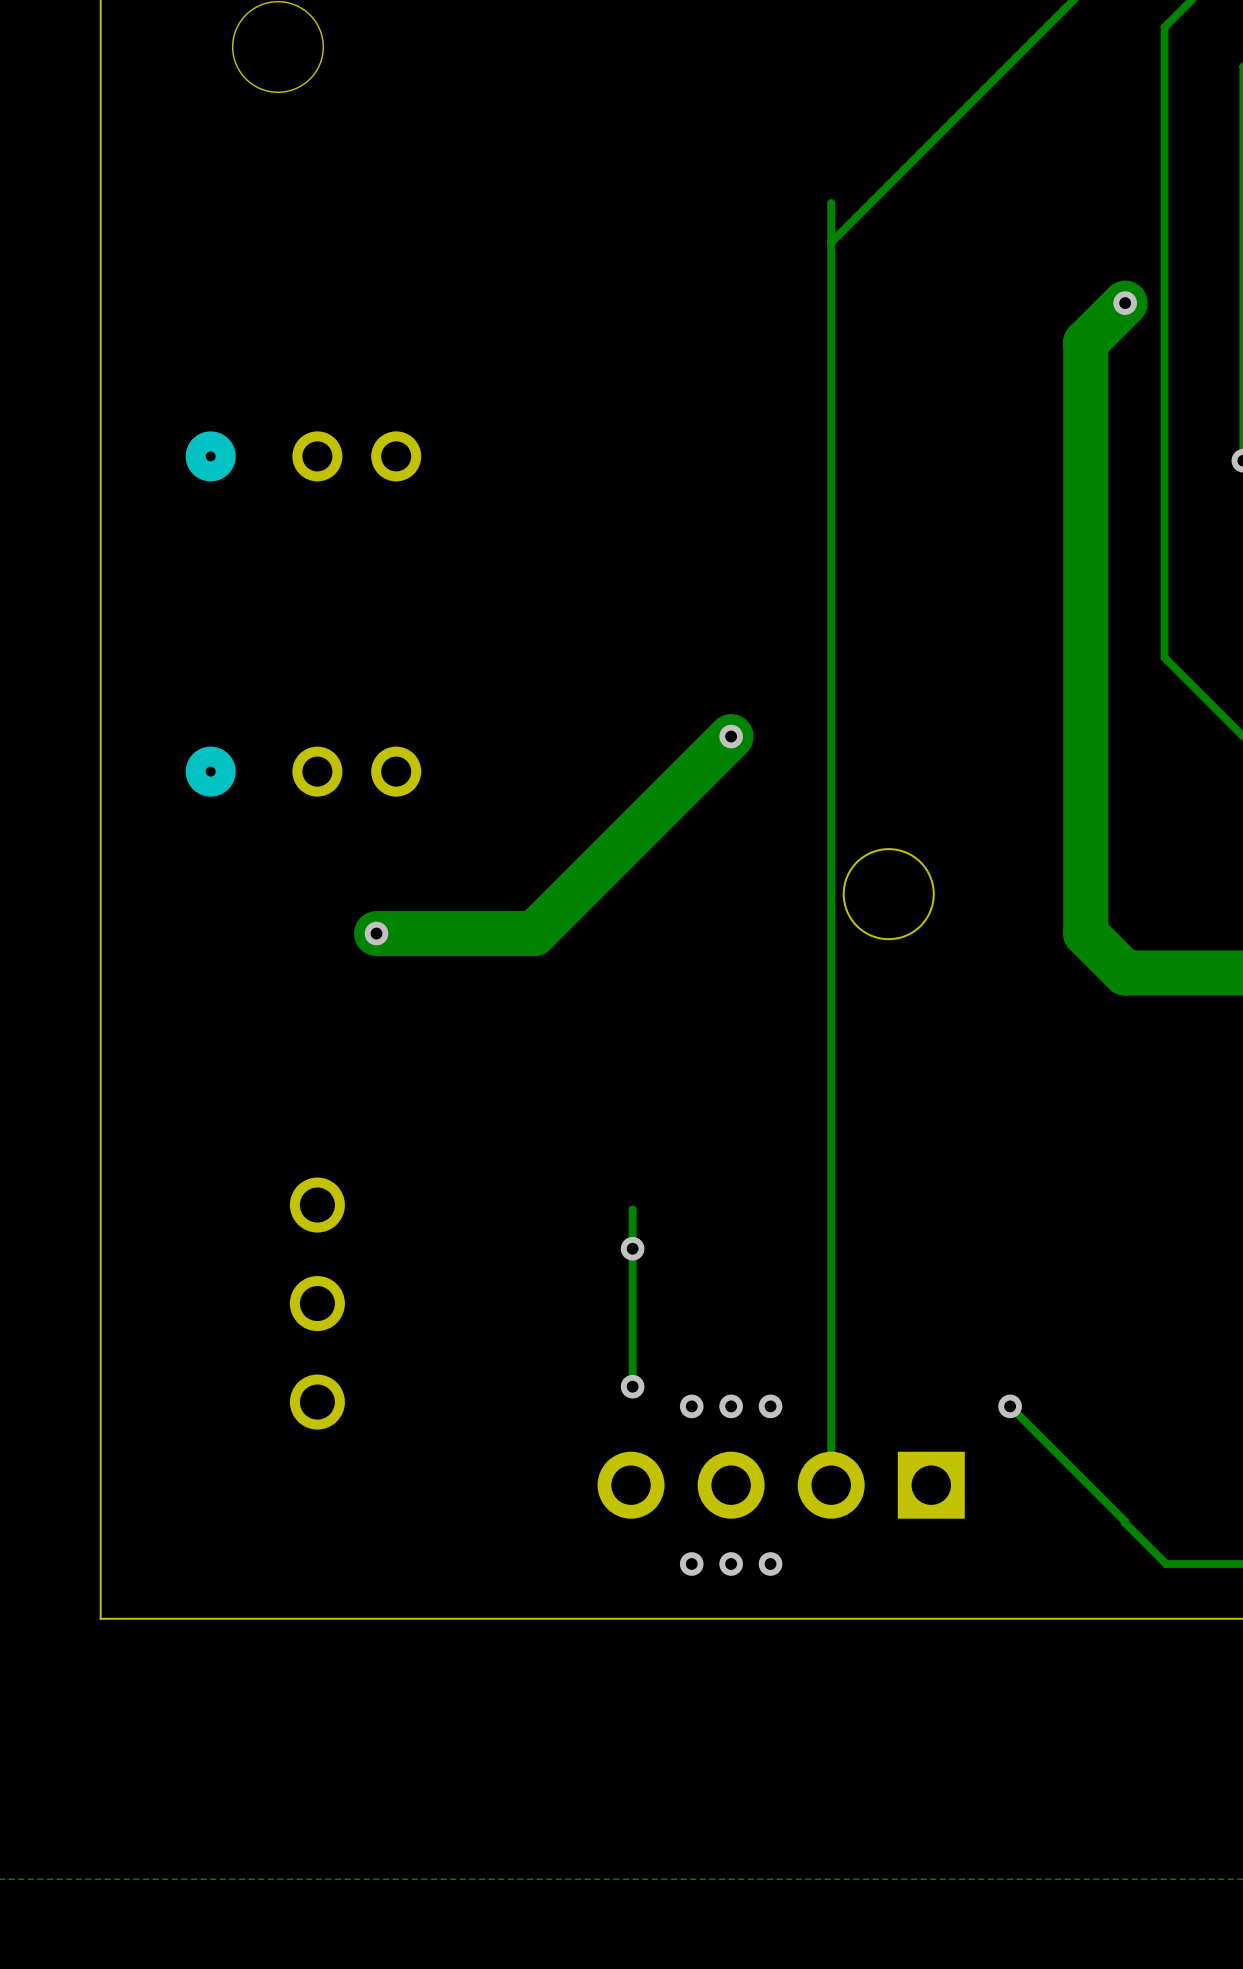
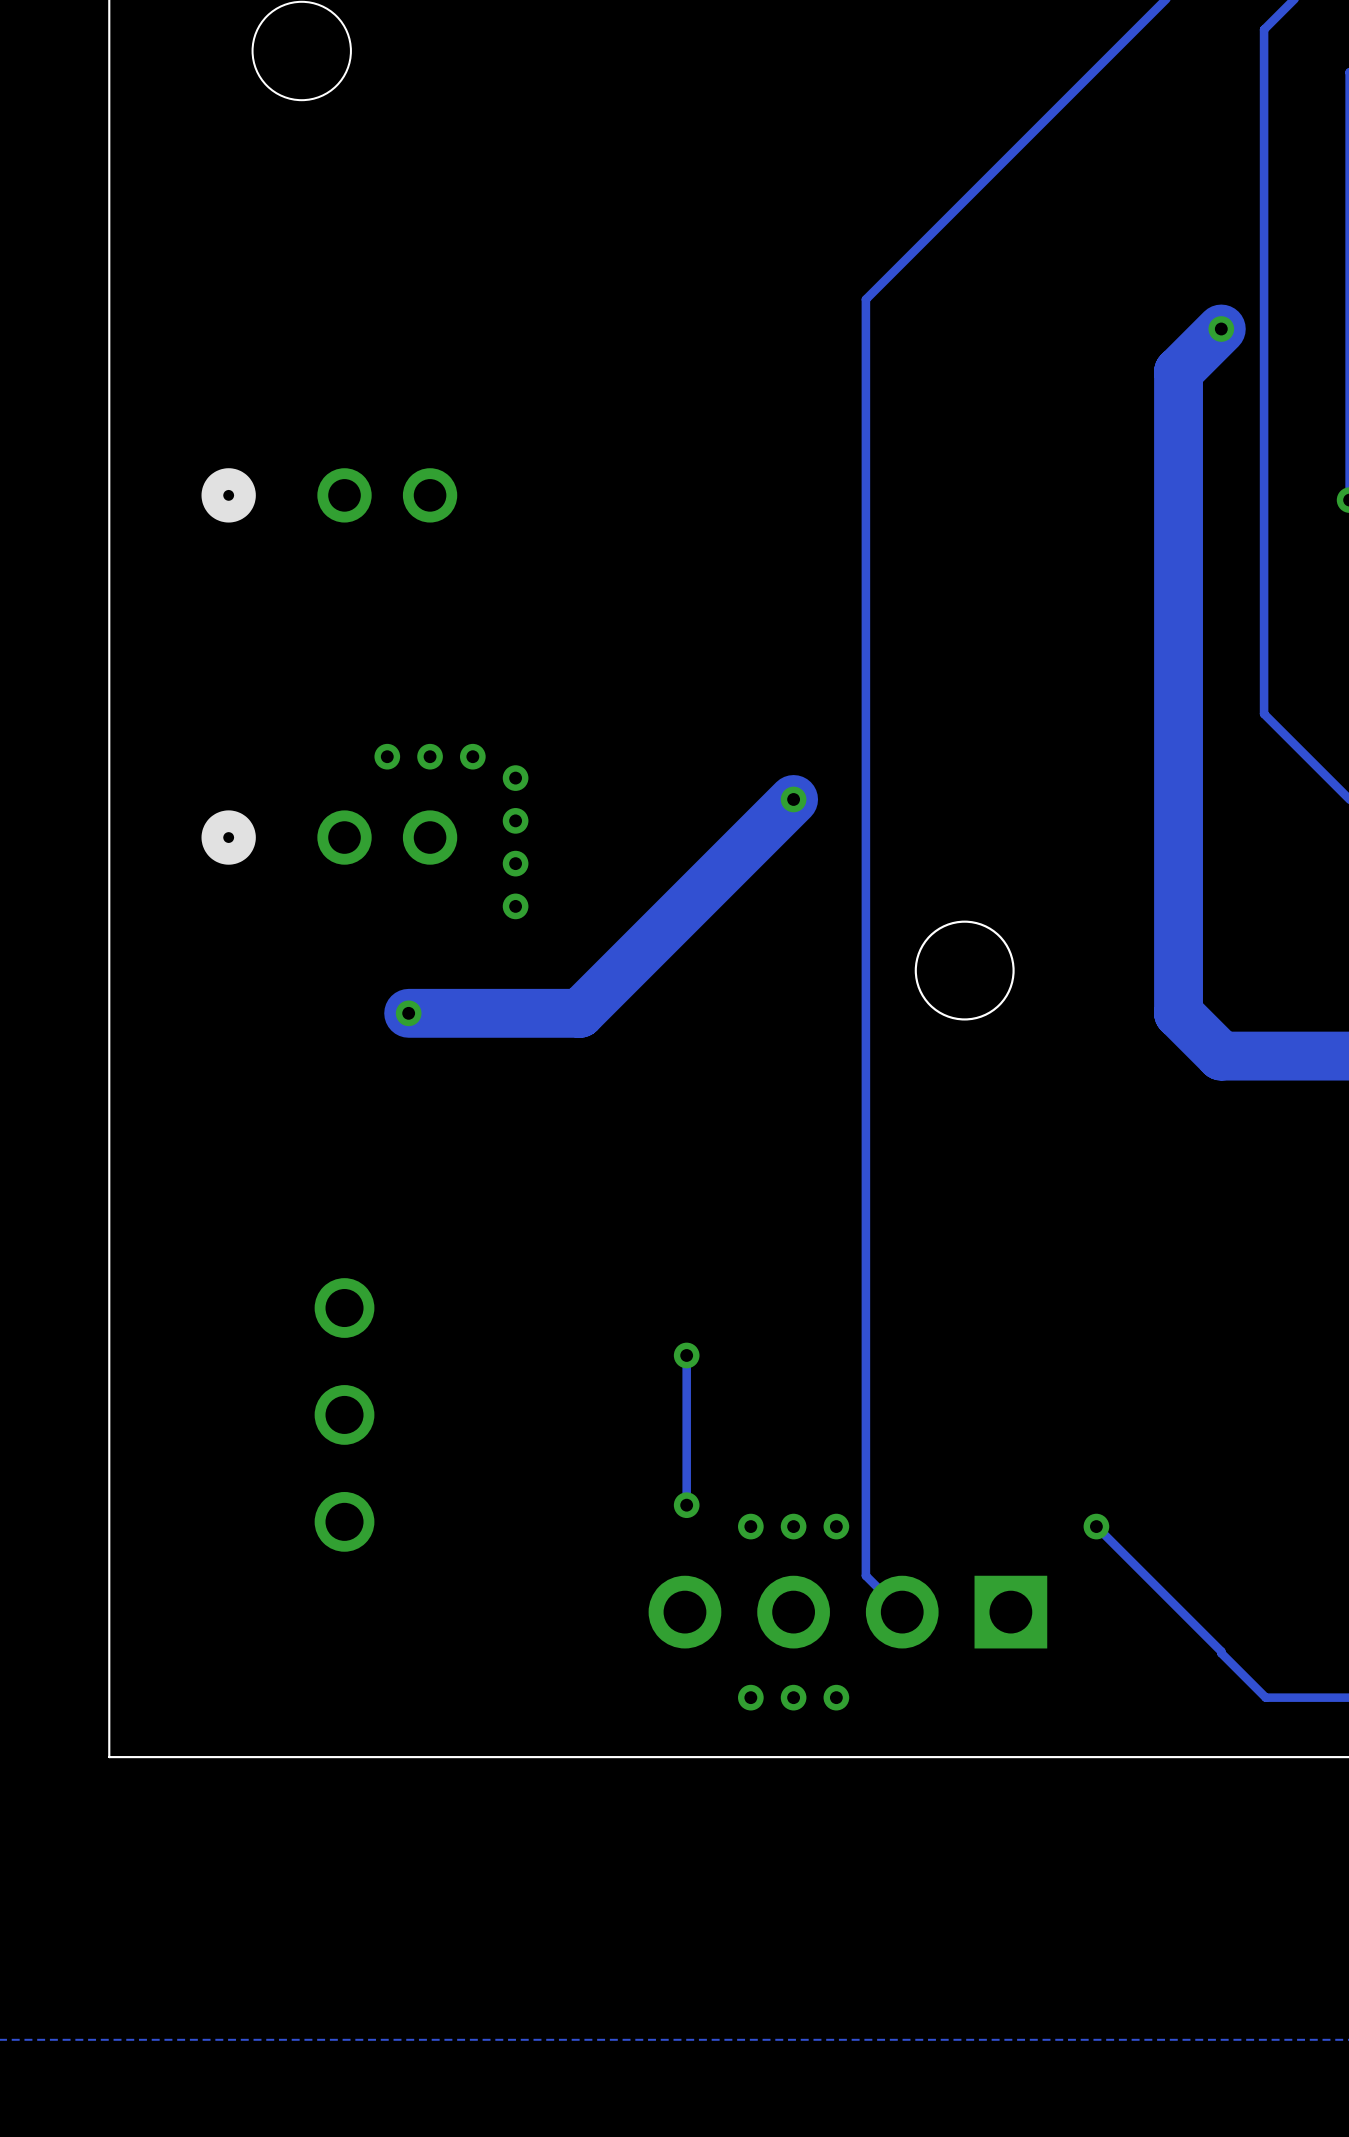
track: (831, 203) (831, 1485) -> (902, 263) (865, 299) (865, 1575) (902, 1612)
via: none -> (387, 756)
via: none -> (430, 756)
via: none -> (472, 756)
via: none -> (515, 778)
via: none -> (515, 820)
via: none -> (515, 863)
via: none -> (515, 906)
track: (632, 1209) (632, 1248) -> none

